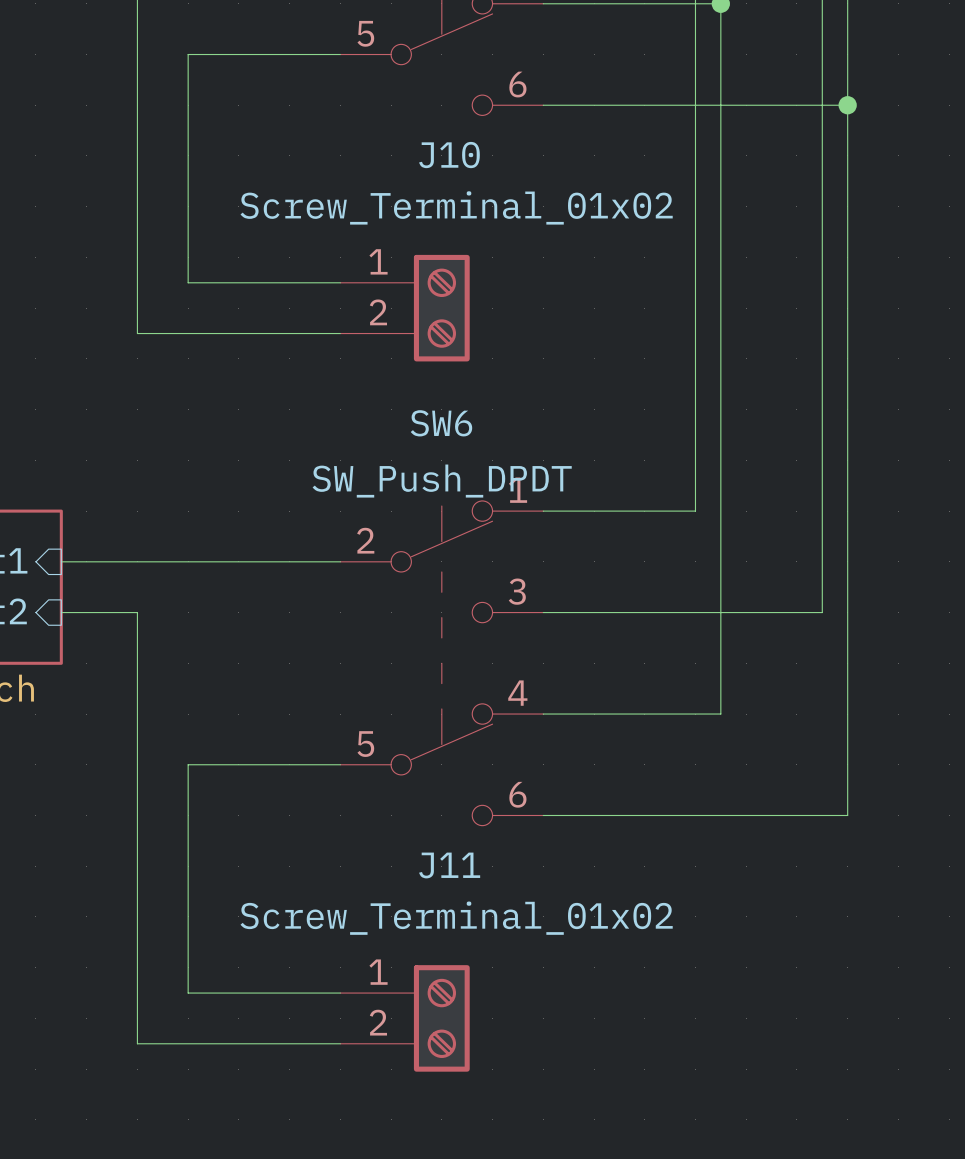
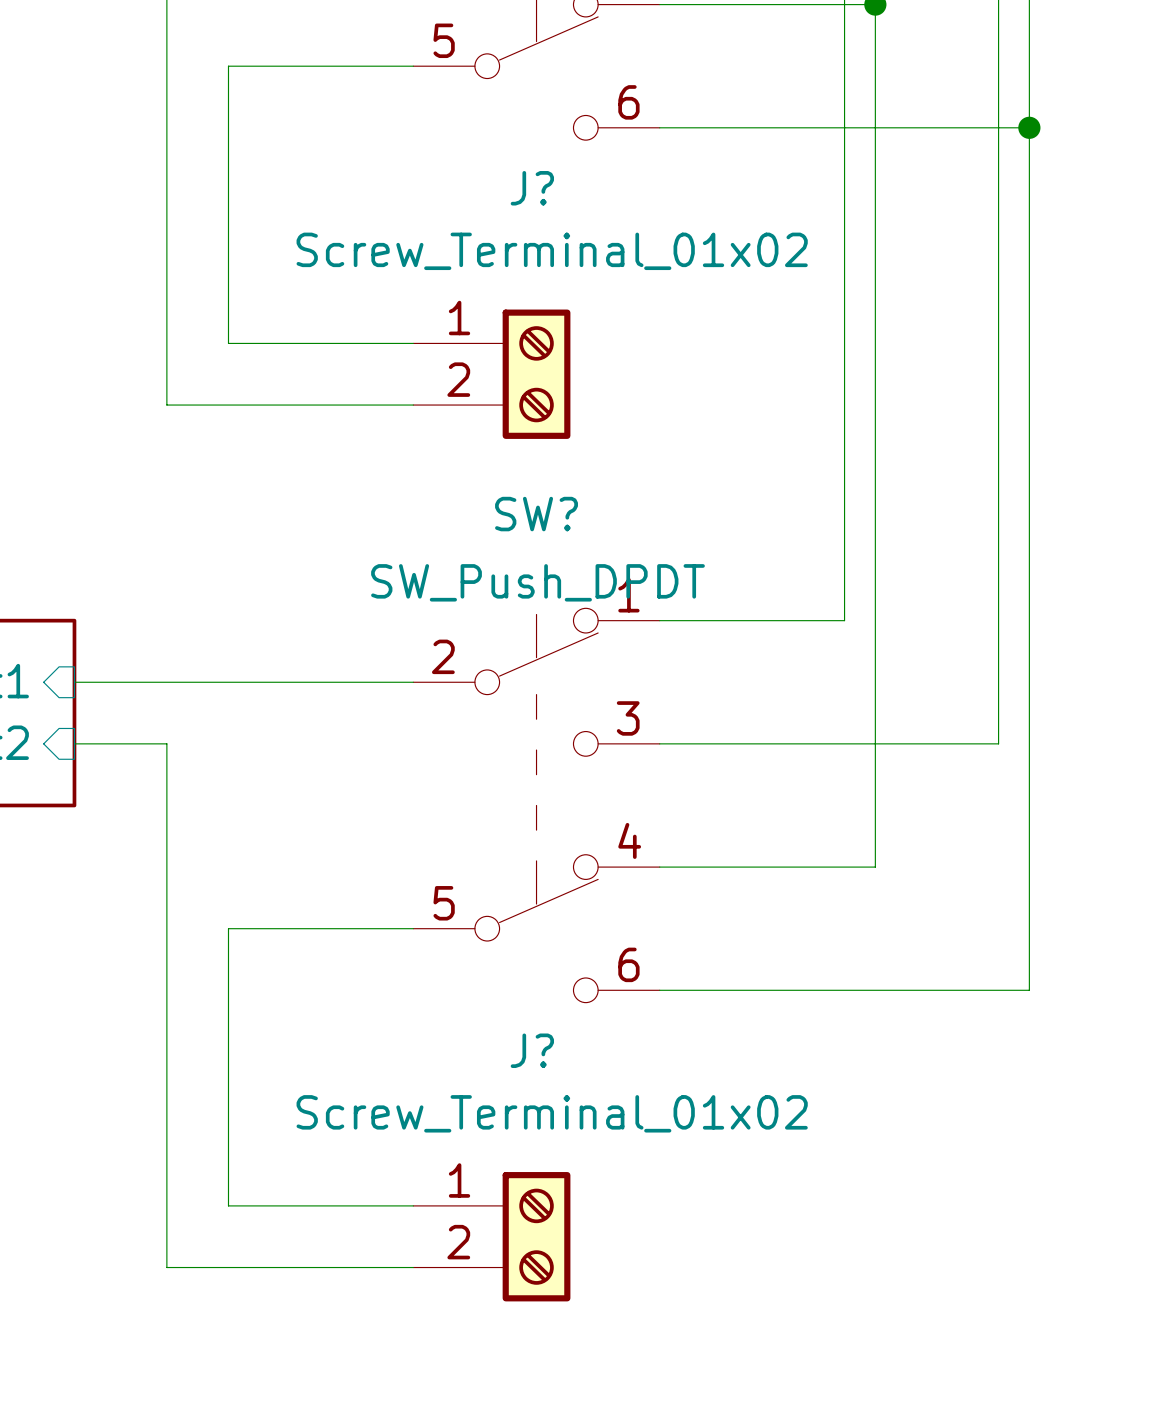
J10 name: J10 (449, 155) -> J? (532, 188)
SW6 name: SW6 (441, 423) -> SW? (536, 514)
J11 name: J11 (449, 865) -> J? (532, 1050)

